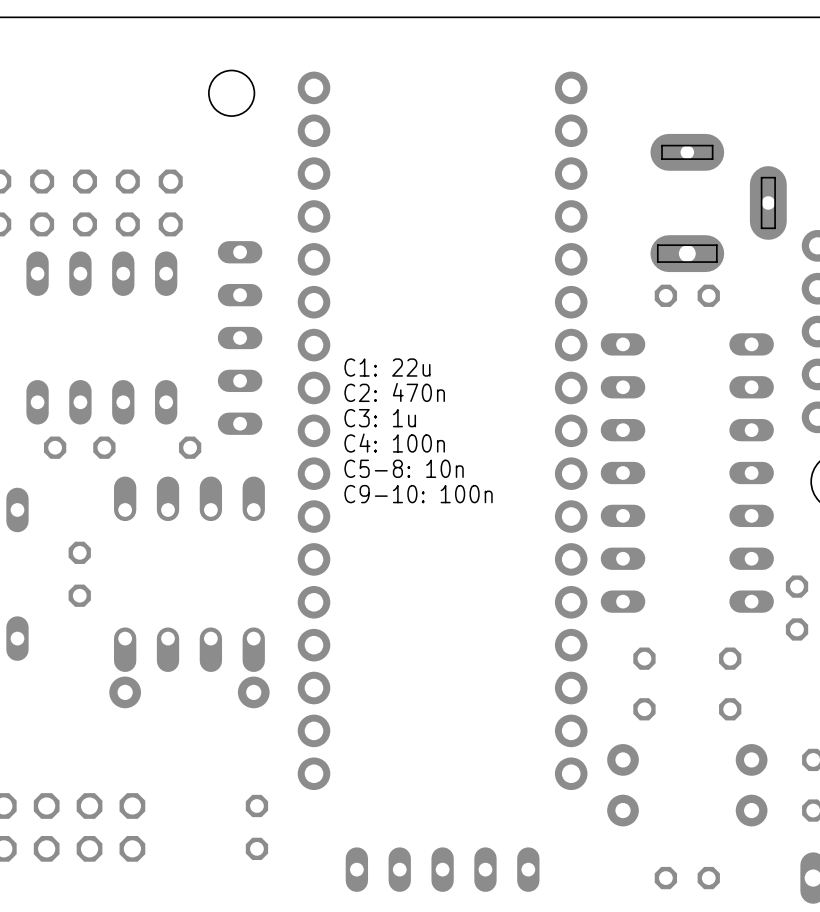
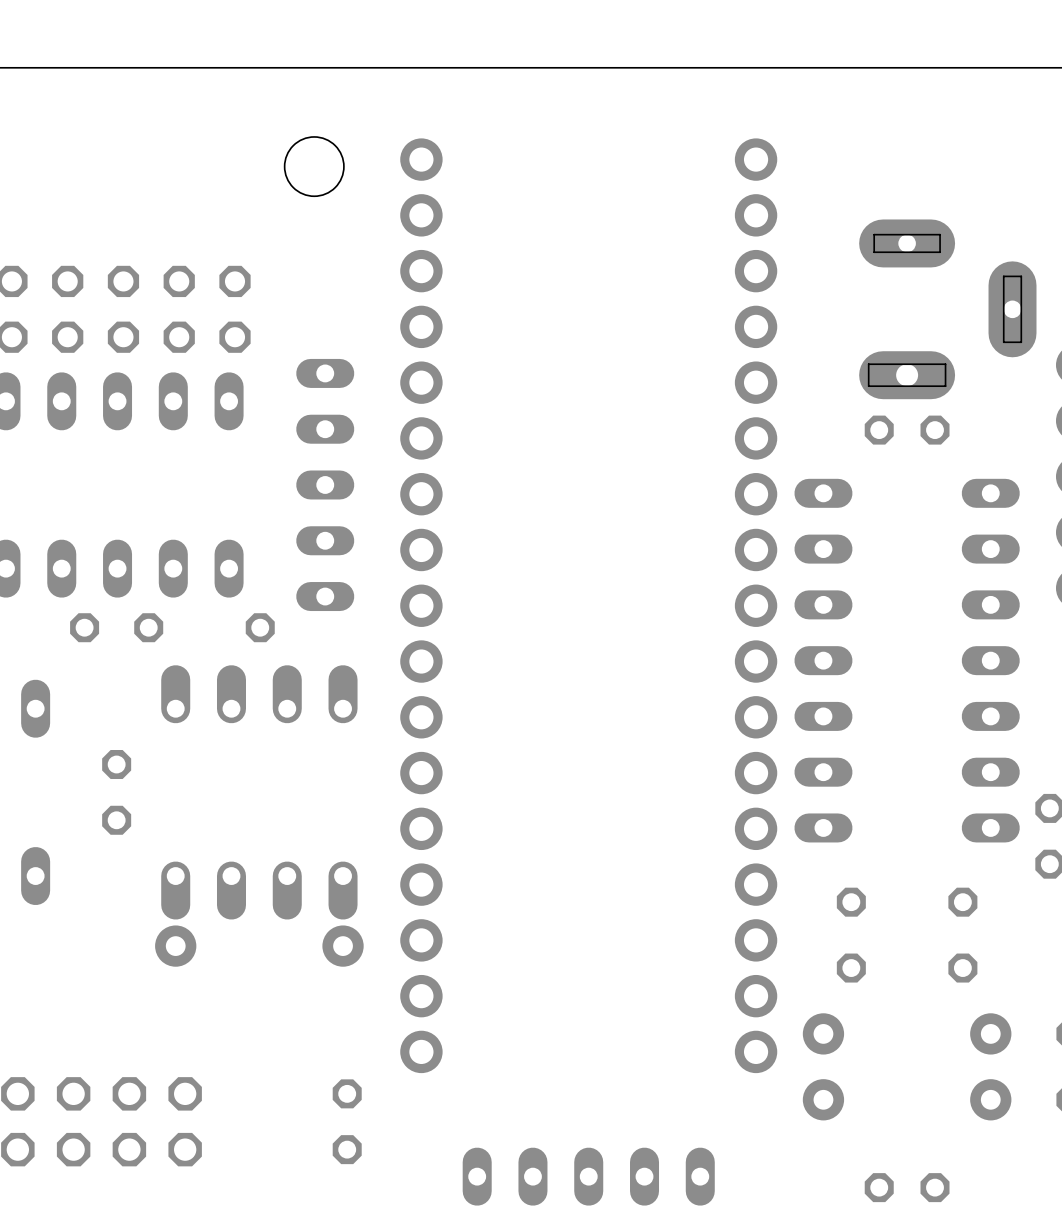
text: C1: 22u (387, 367) -> none
text: C2: 470n (394, 392) -> none
text: C3: 1u (380, 418) -> none
text: C4: 100n (394, 443) -> none
text: C5-8: 10n (404, 468) -> none
text: C9-10: 100n (418, 494) -> none

